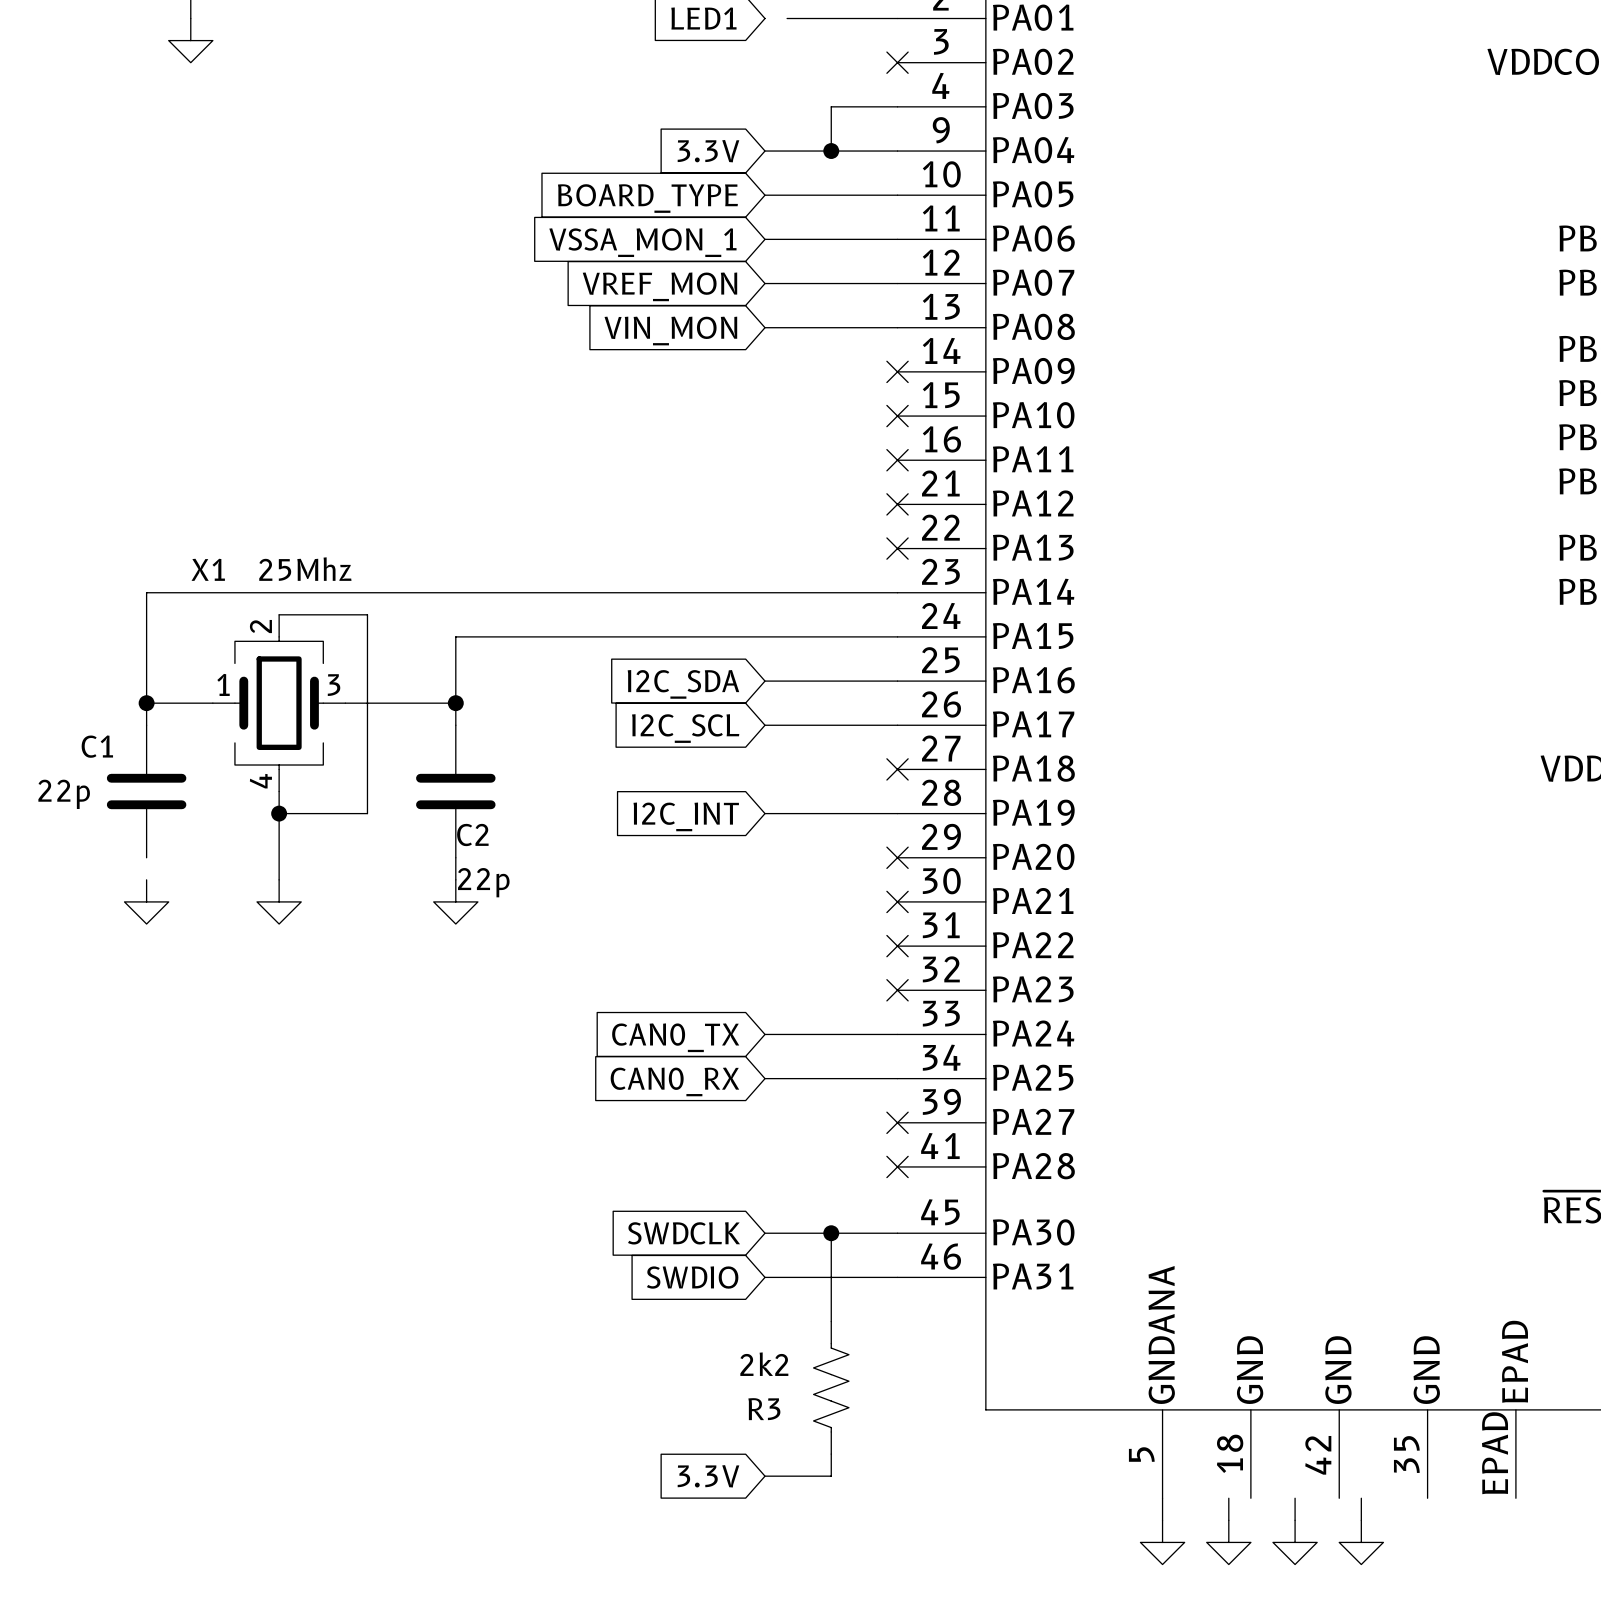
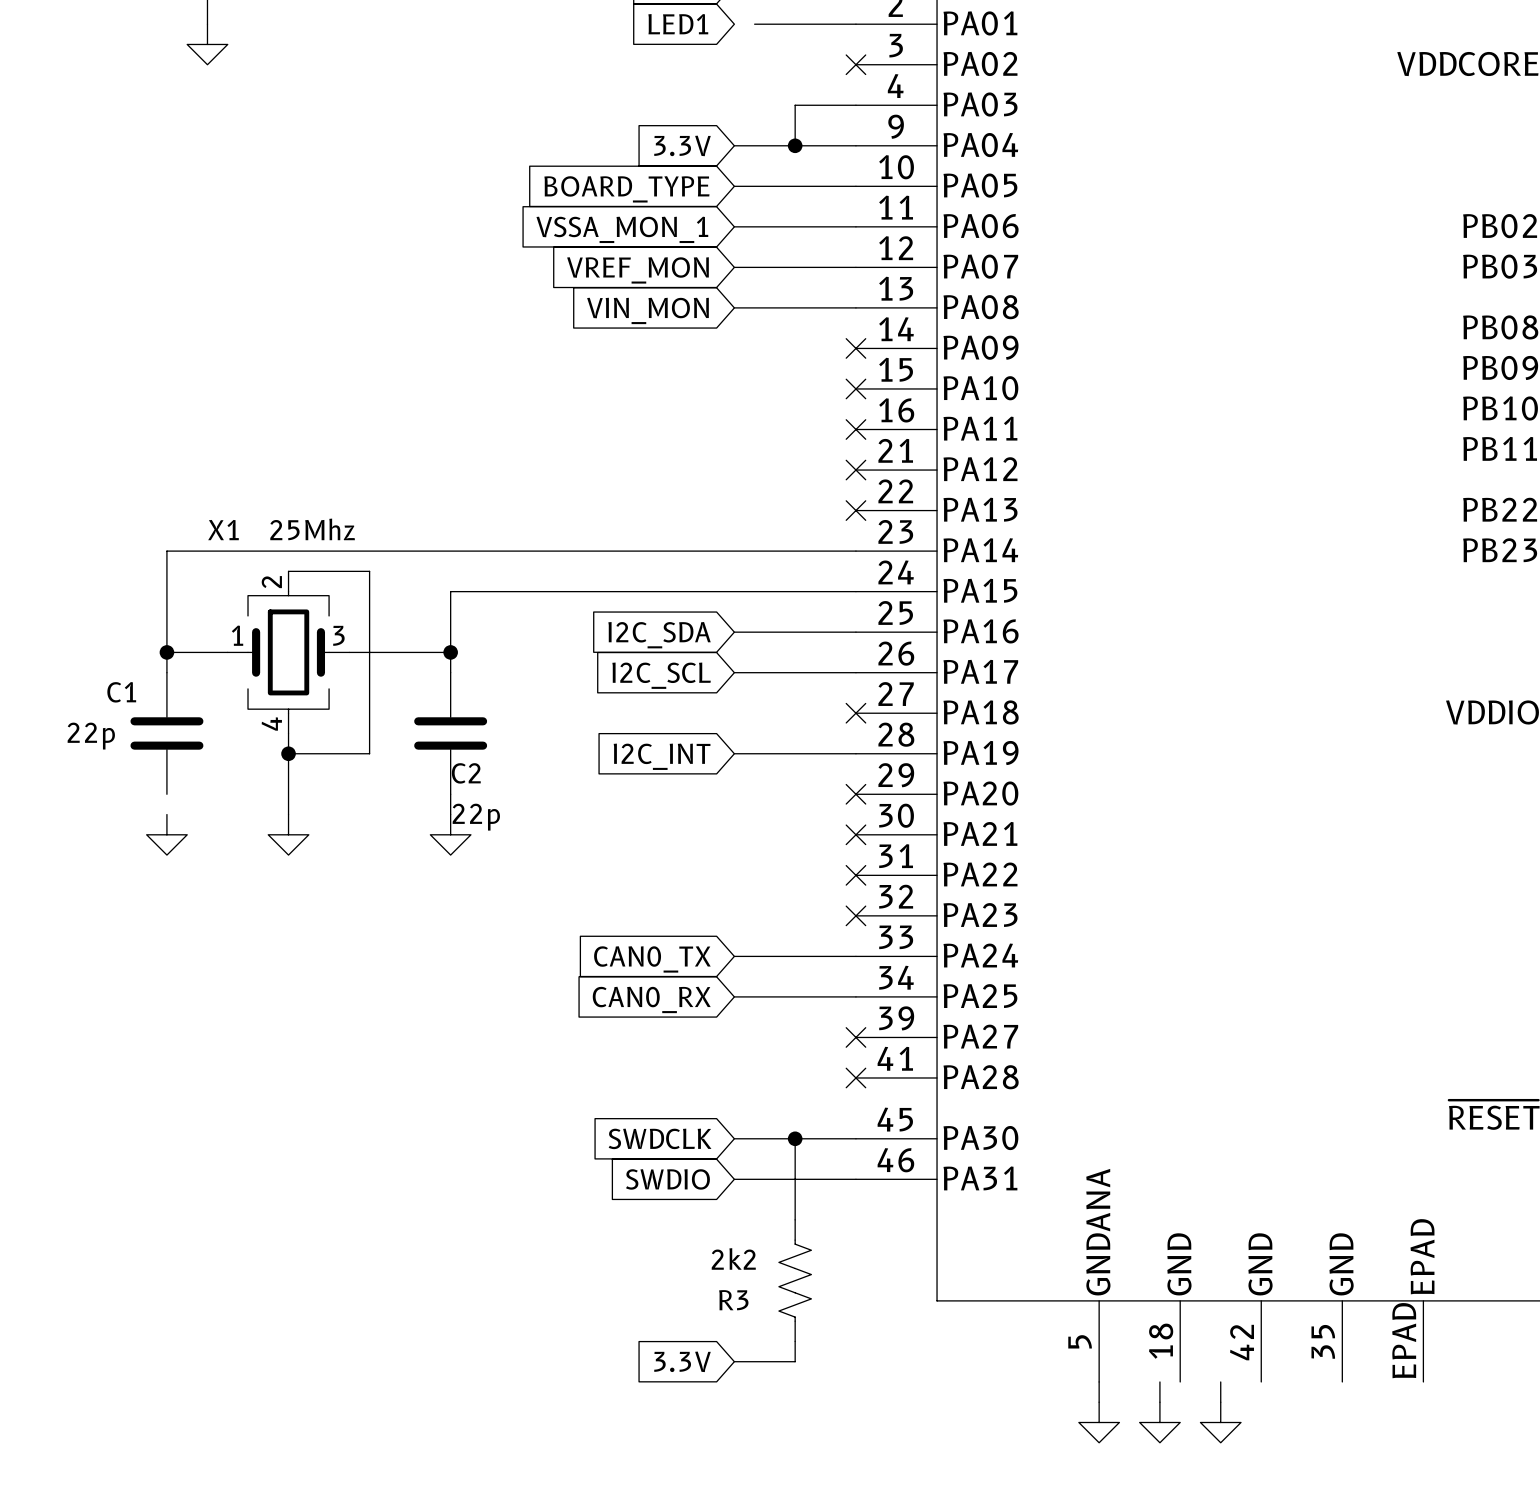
wire: (1361, 1498) (1361, 1520) -> none
power symbol: (1361, 1542) -> none

